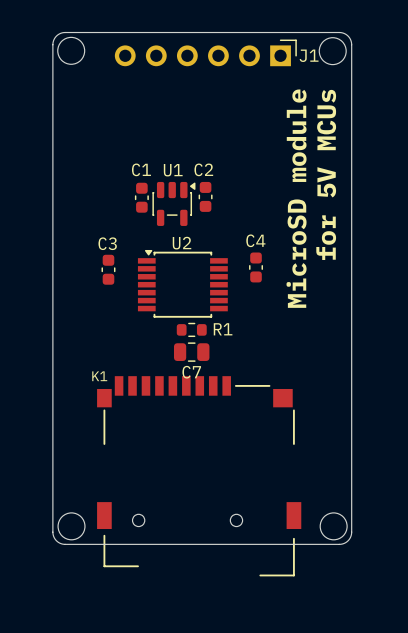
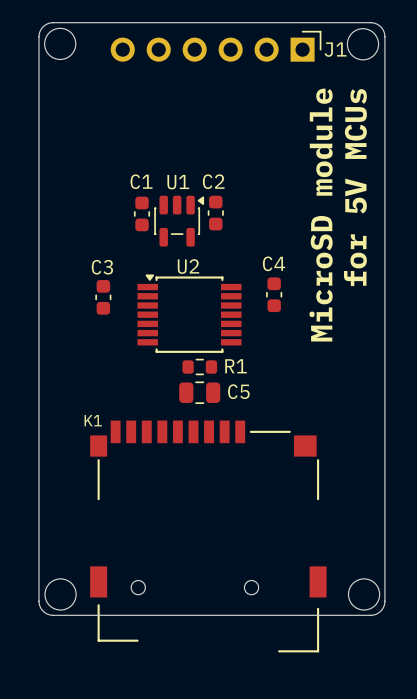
C7 name: C7 (191, 372) -> C5 (238, 391)

